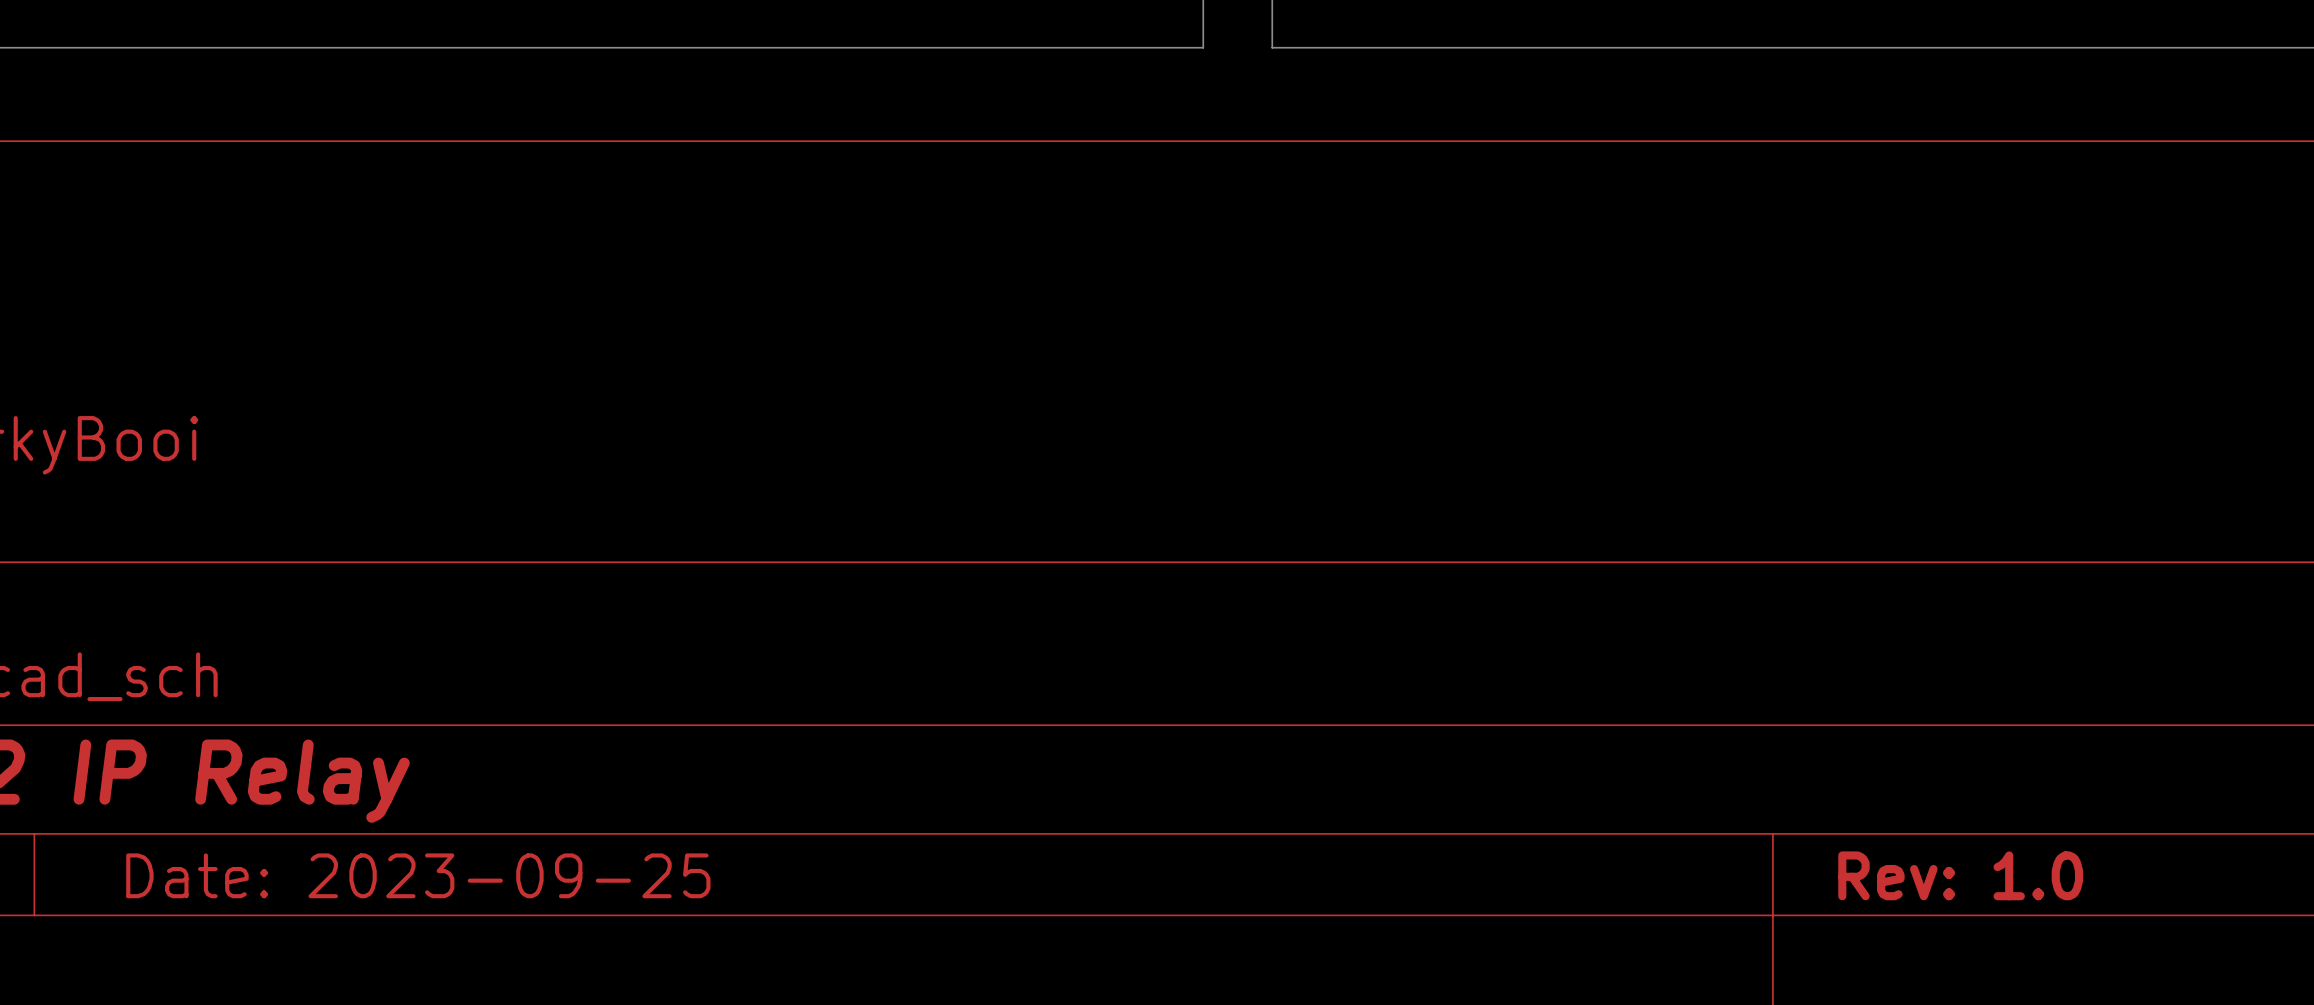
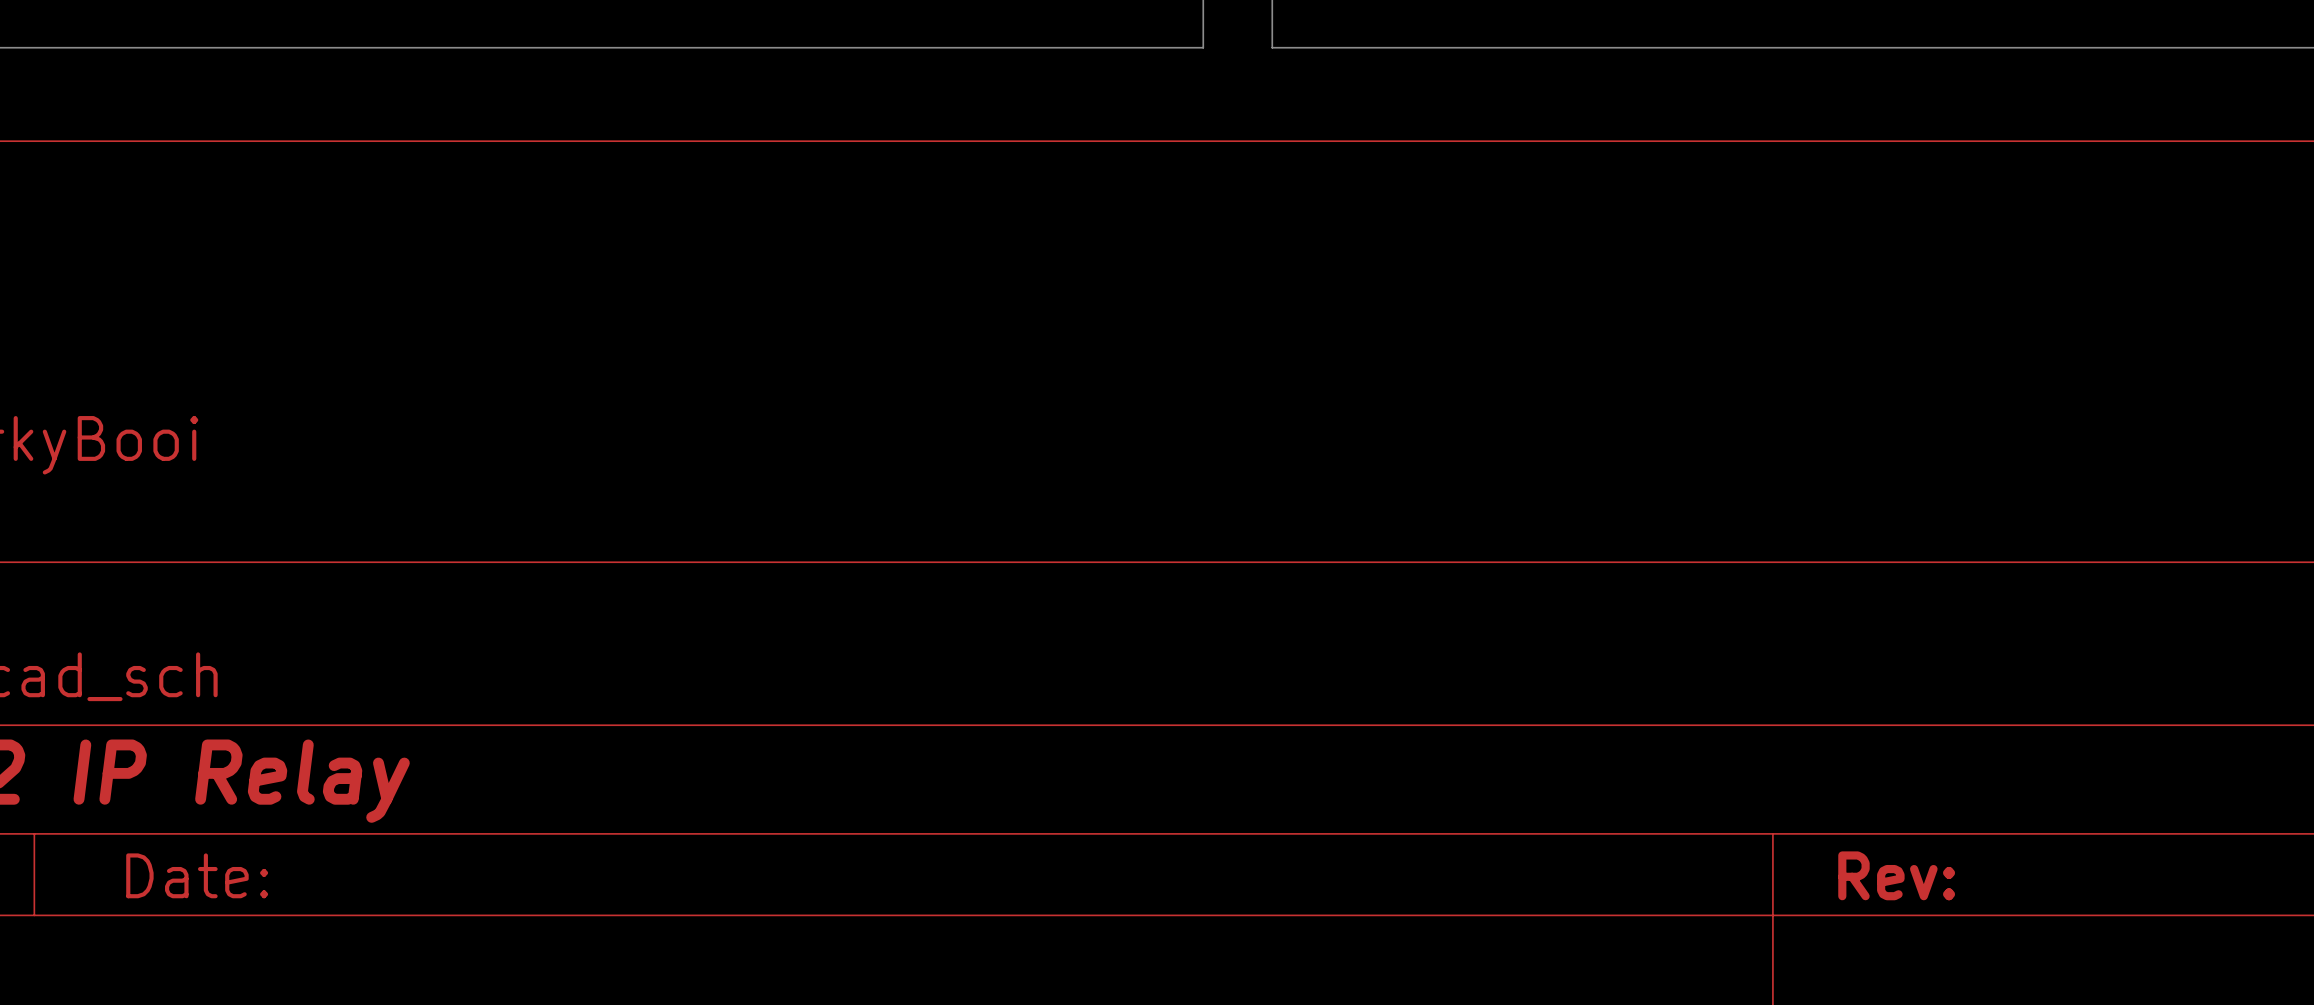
title block: Date: 2023-09-25 (418, 875) -> Date: (197, 875)
title block: Rev: 1.0 (1960, 875) -> Rev: (1896, 875)

